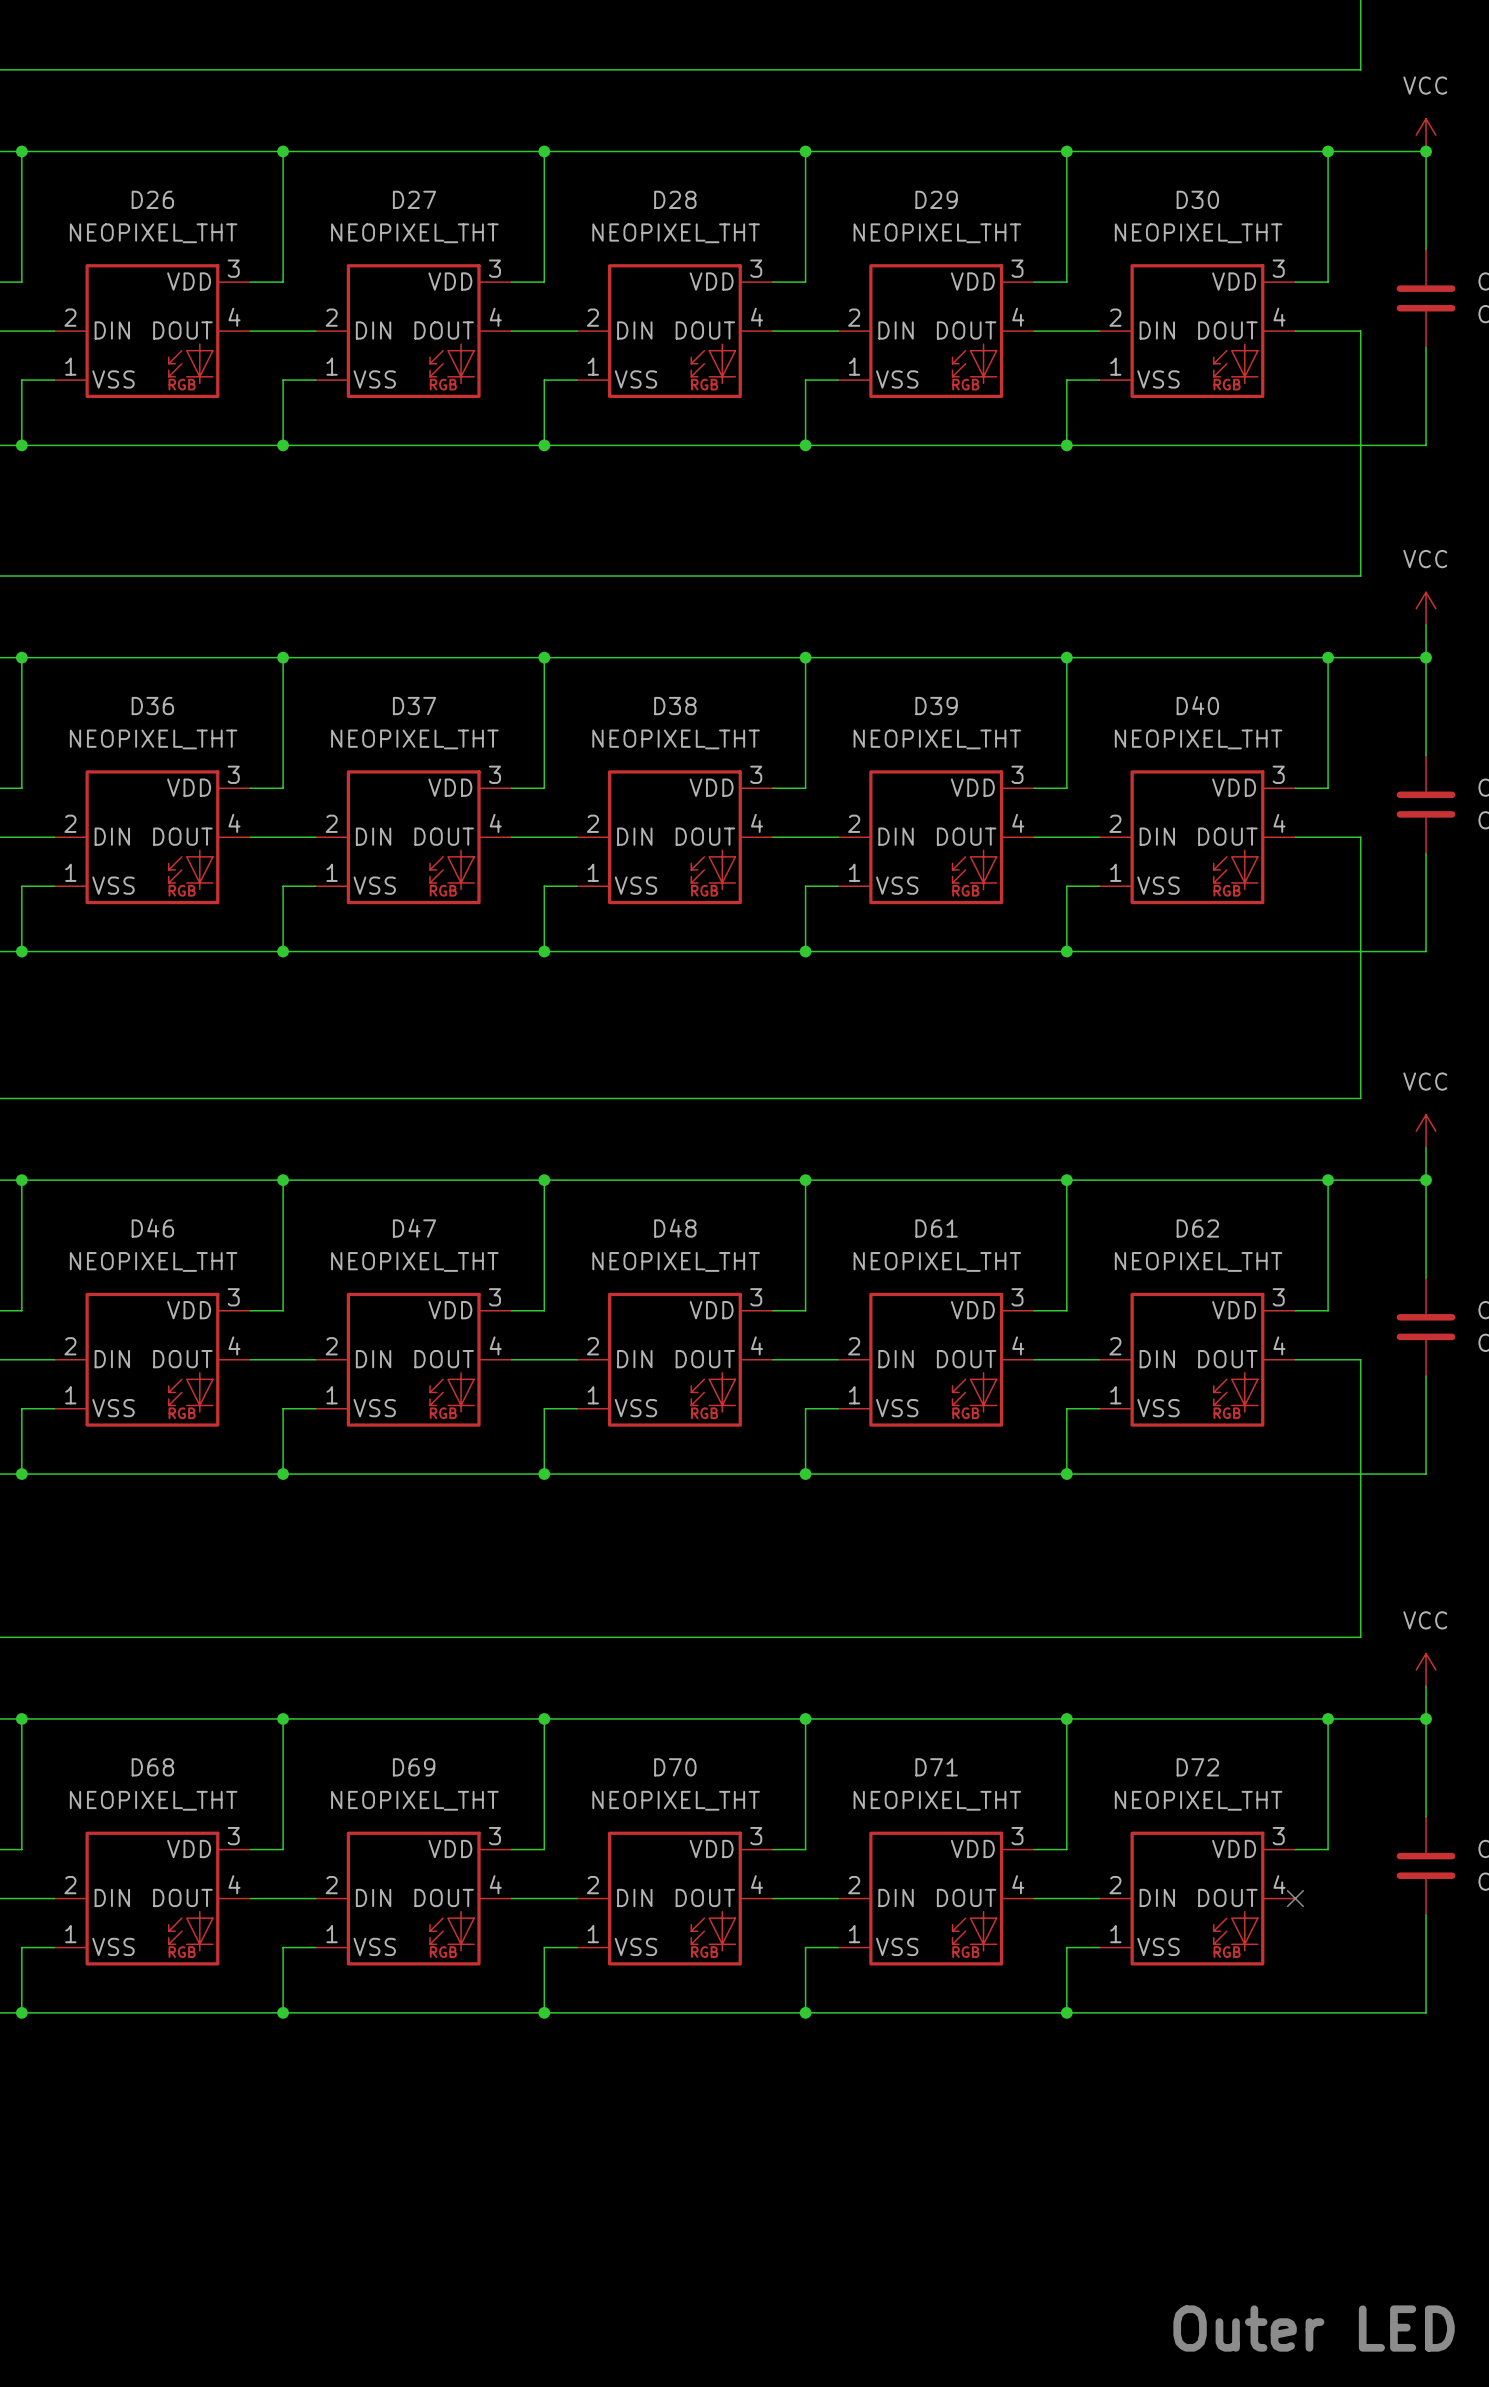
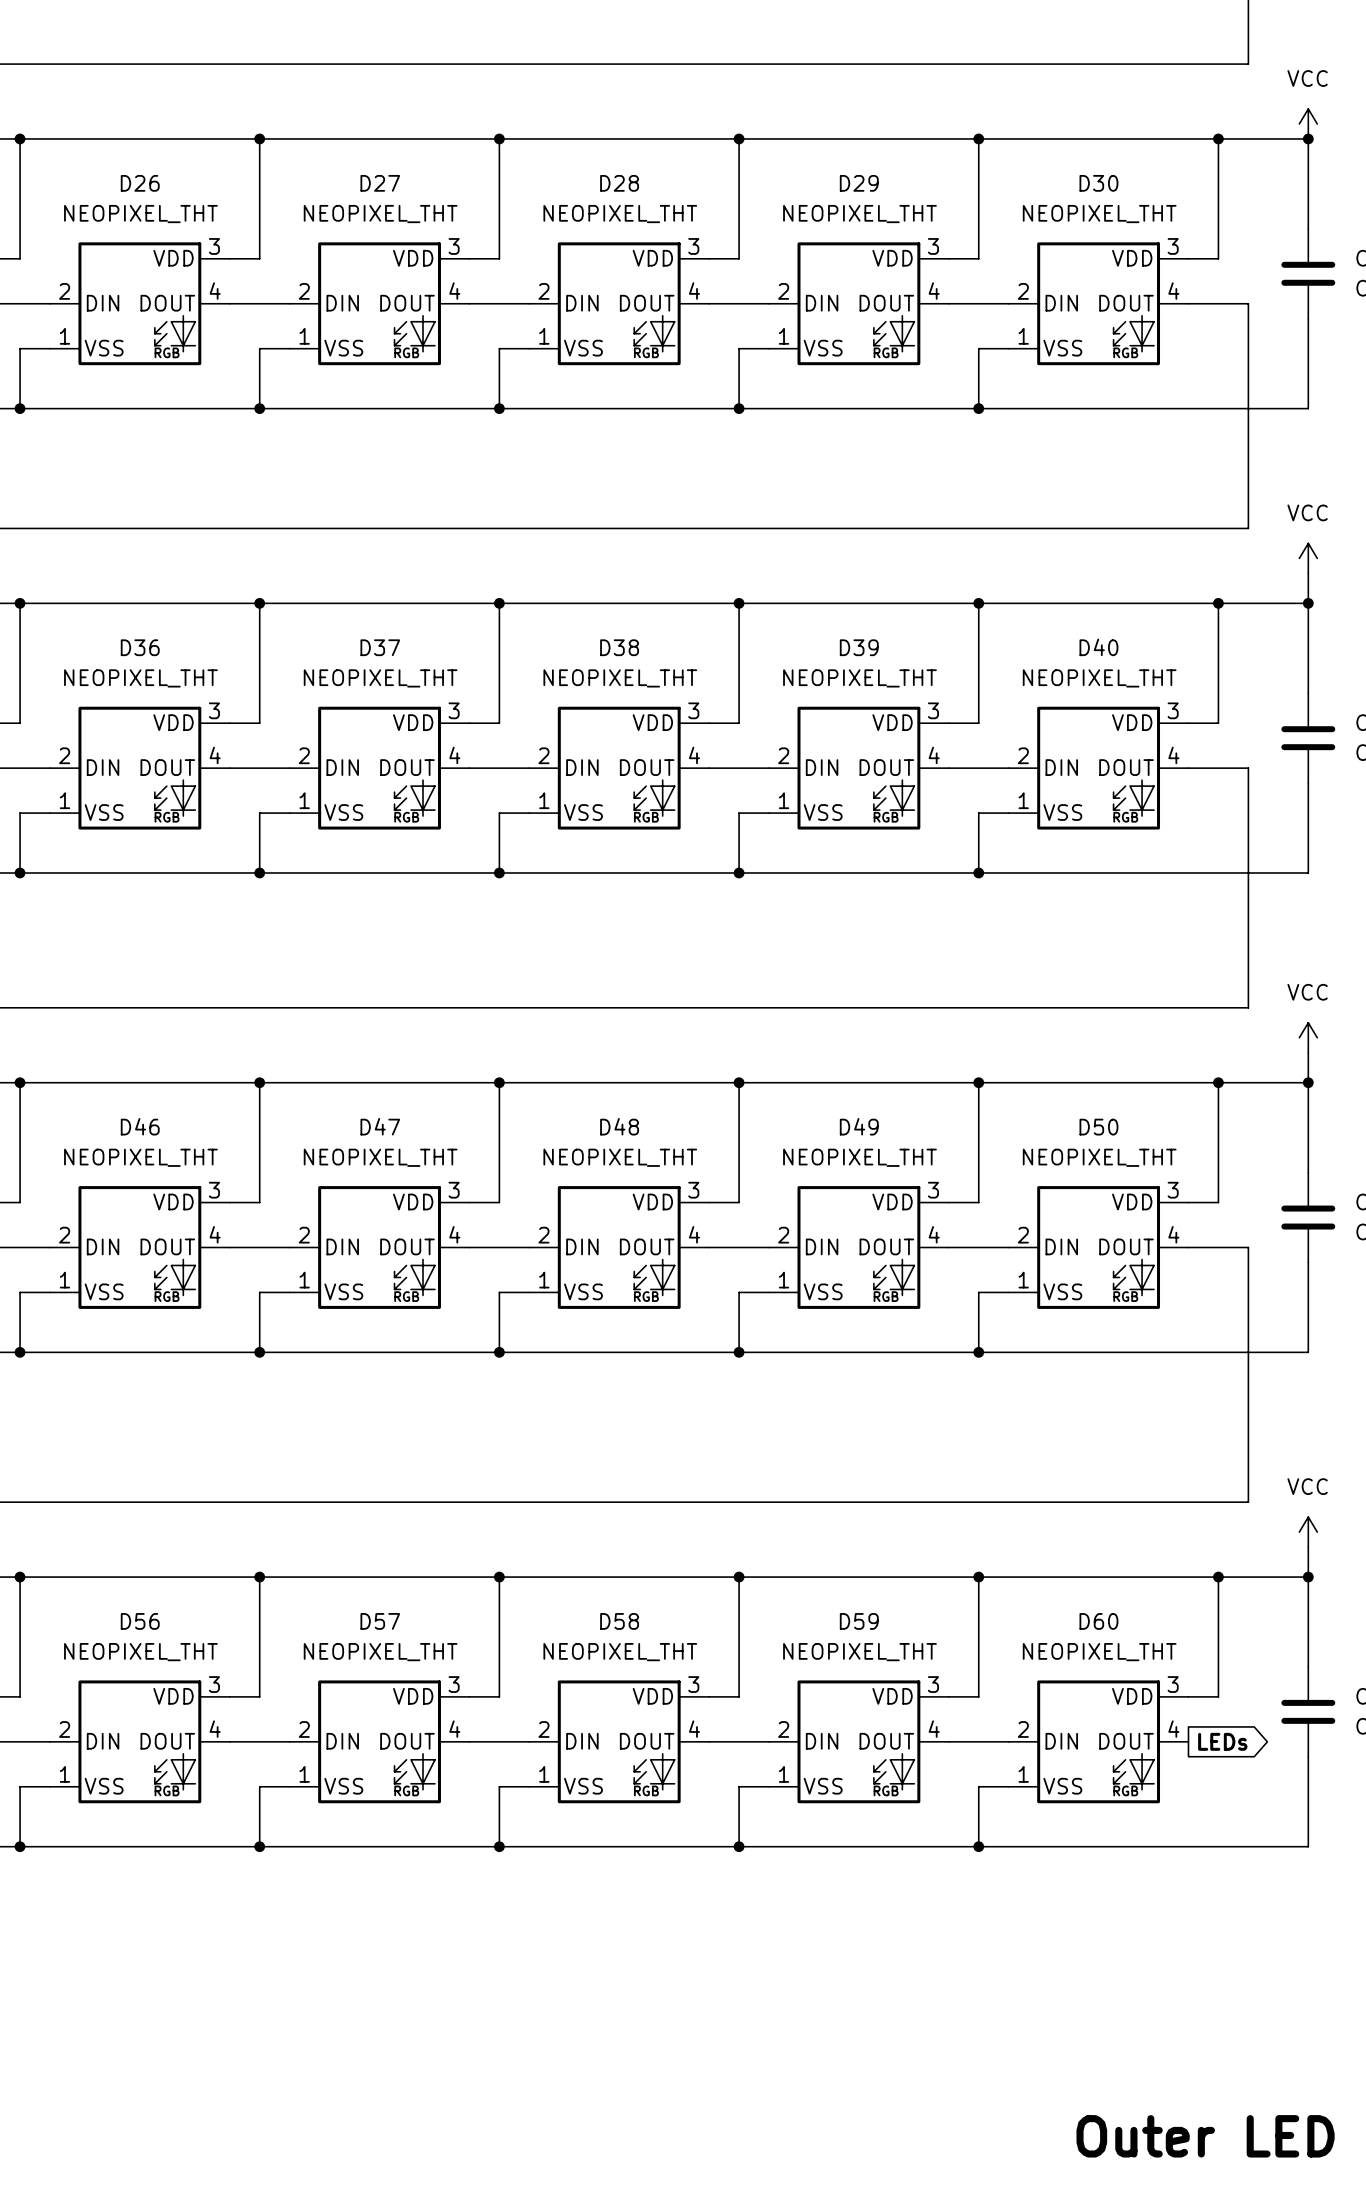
D61 name: D61 (936, 1228) -> D49 (859, 1126)
D62 name: D62 (1197, 1228) -> D50 (1098, 1127)
D68 name: D68 (152, 1767) -> D56 (140, 1621)
D69 name: D69 (414, 1767) -> D57 (380, 1621)
D70 name: D70 (675, 1767) -> D58 (619, 1621)
D71 name: D71 (936, 1767) -> D59 (859, 1621)
D72 name: D72 (1197, 1767) -> D60 (1098, 1621)
no-connect mark: (1295, 1898) -> none
global label: none -> LEDs (1222, 1741)

